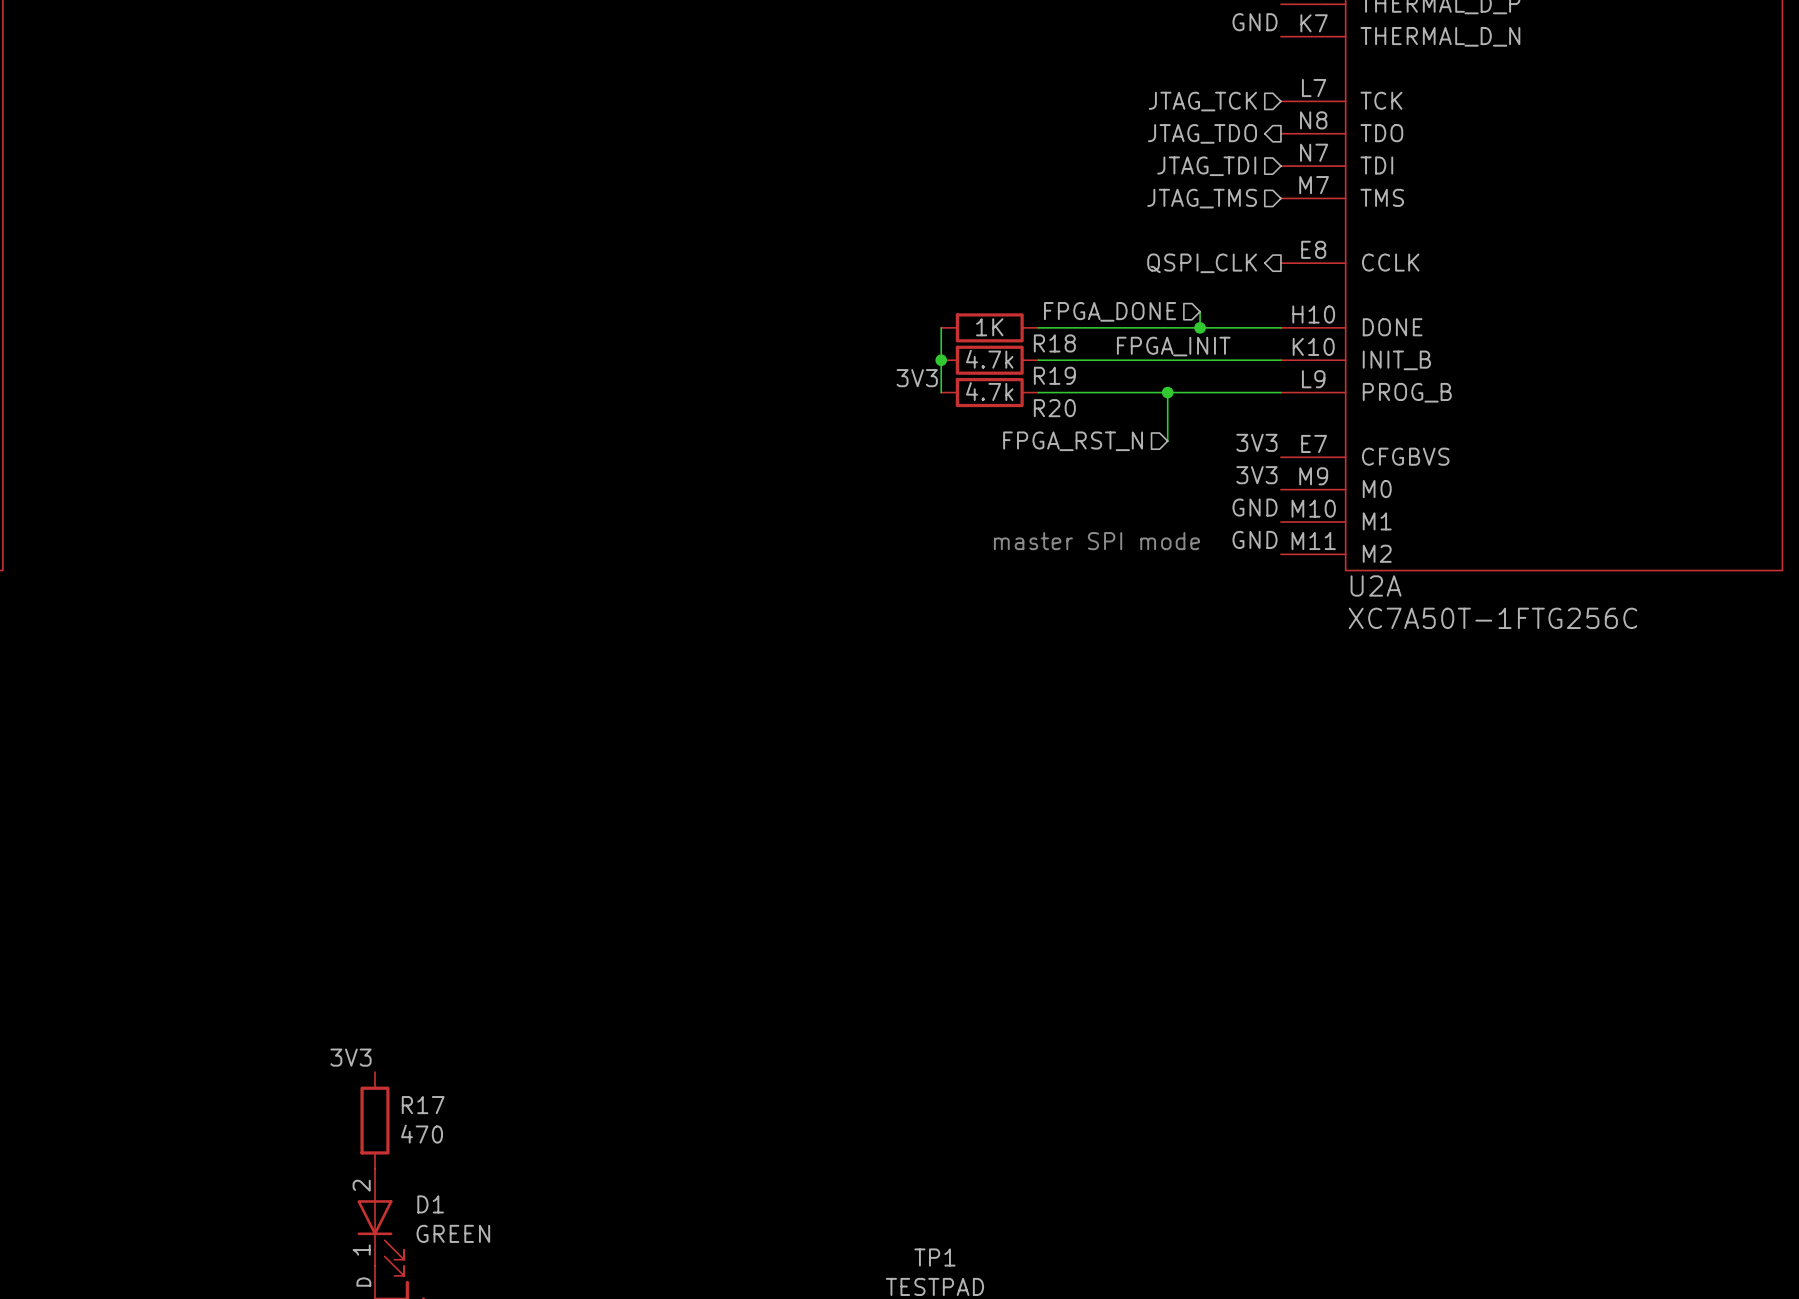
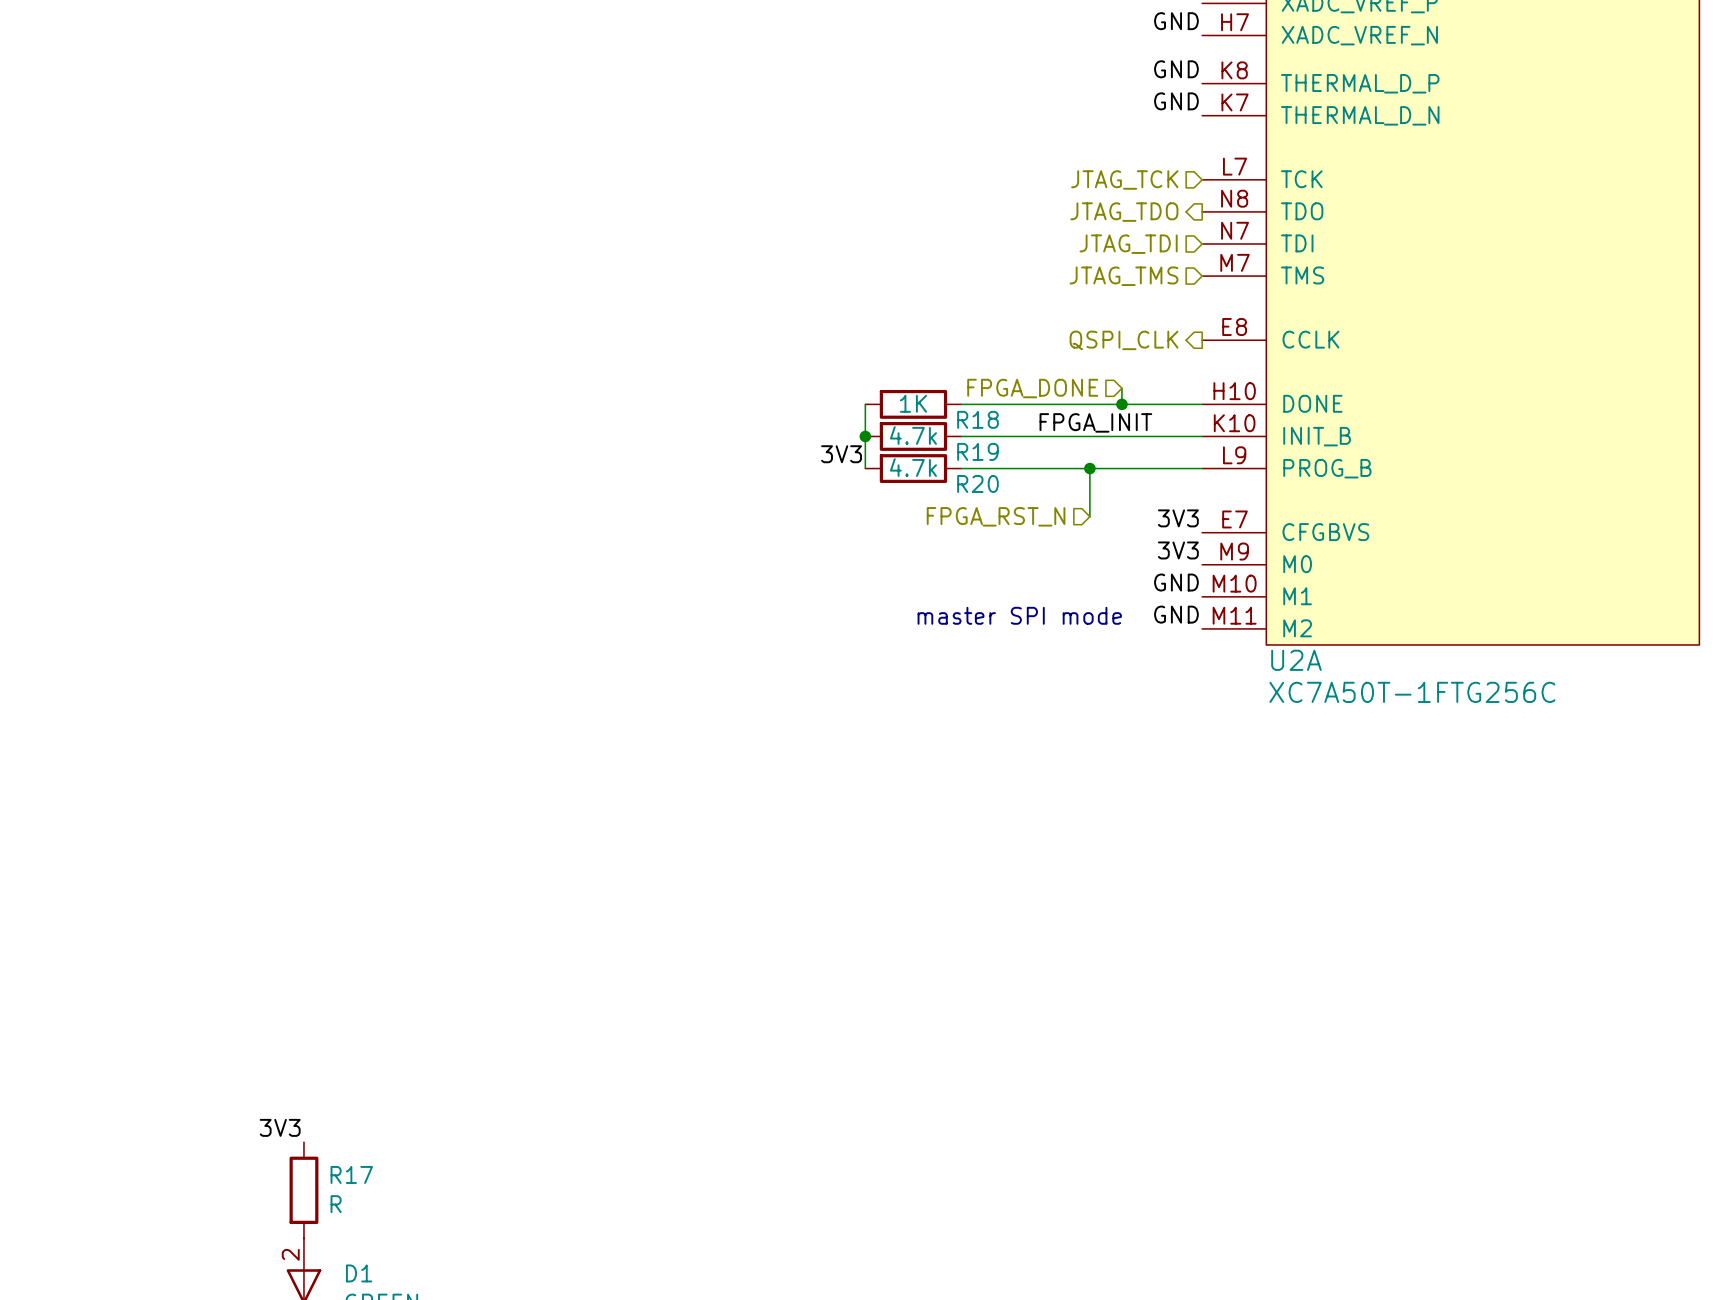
R17 value: 470 (422, 1134) -> R (336, 1204)

